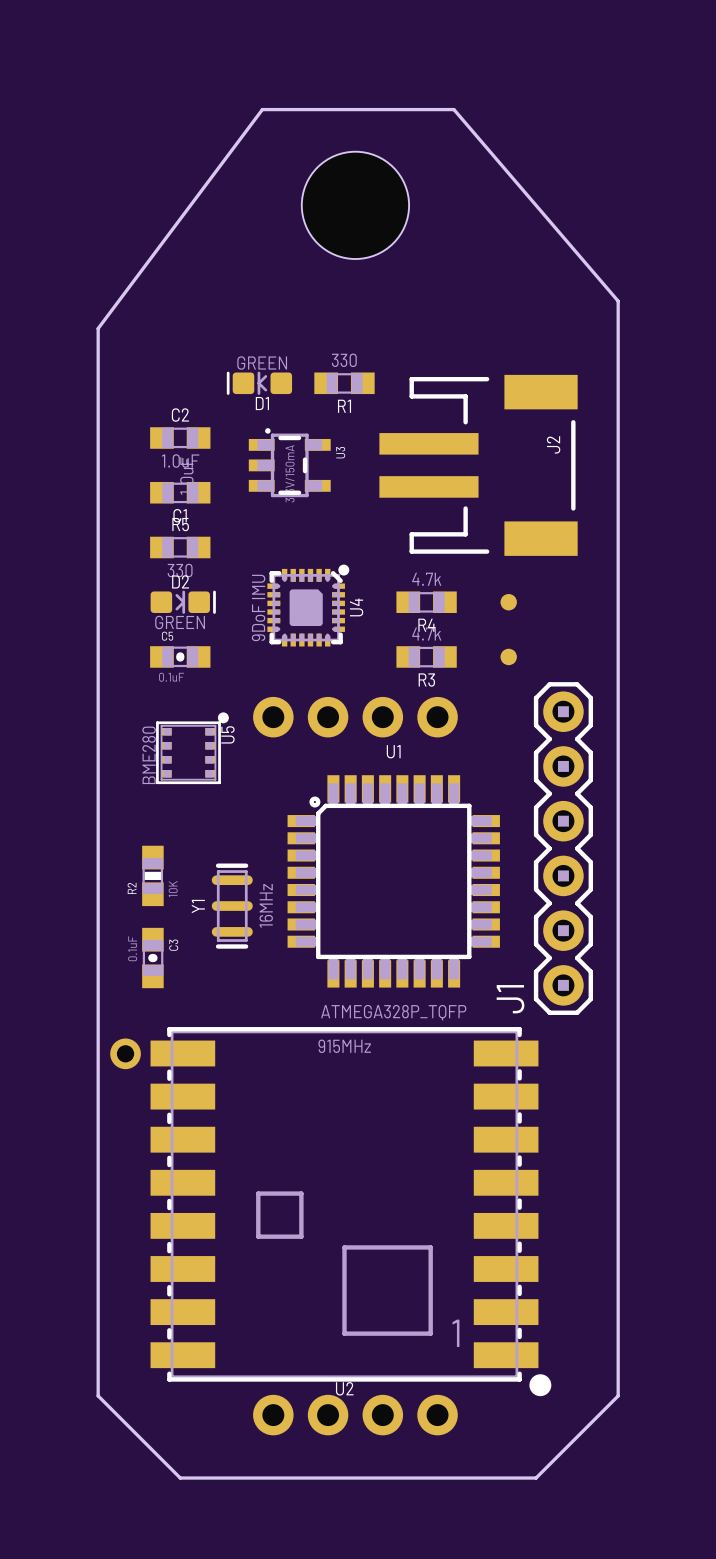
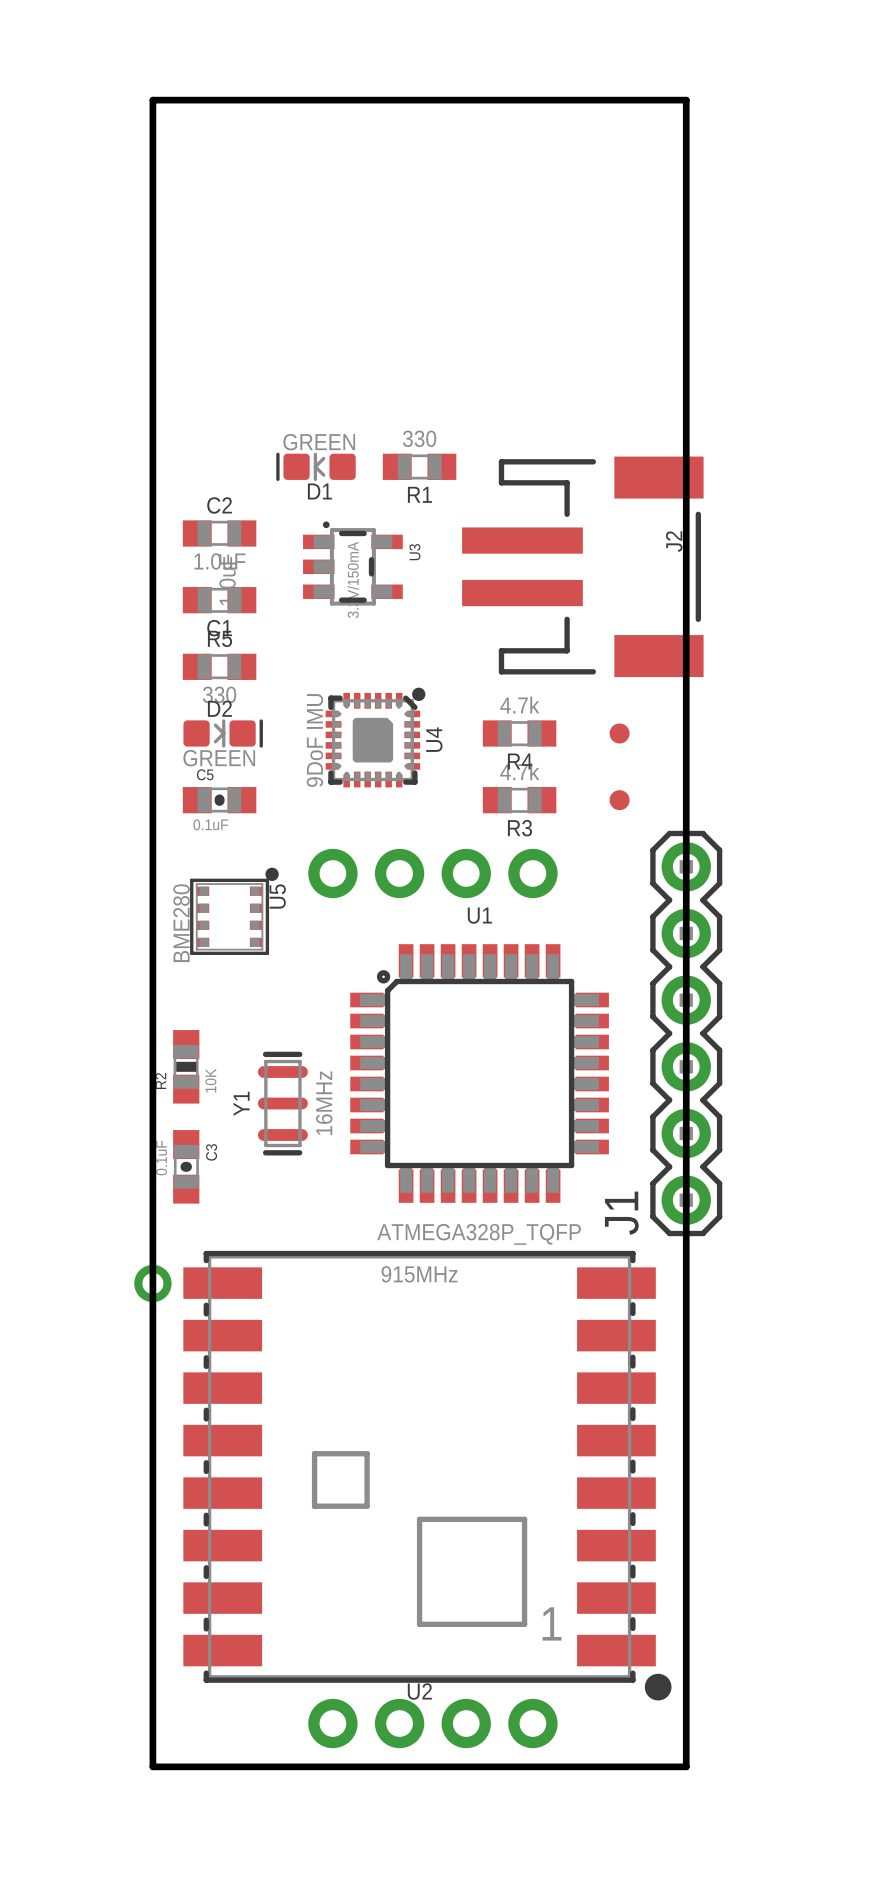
board edge: (262, 109) (98, 328) (98, 1395) (180, 1478) (536, 1478) (618, 1395) (618, 301) (453, 109) (262, 109) -> (152, 100) (152, 1766) (686, 1766) (686, 100) (152, 100)
hole: (355, 205) -> none

